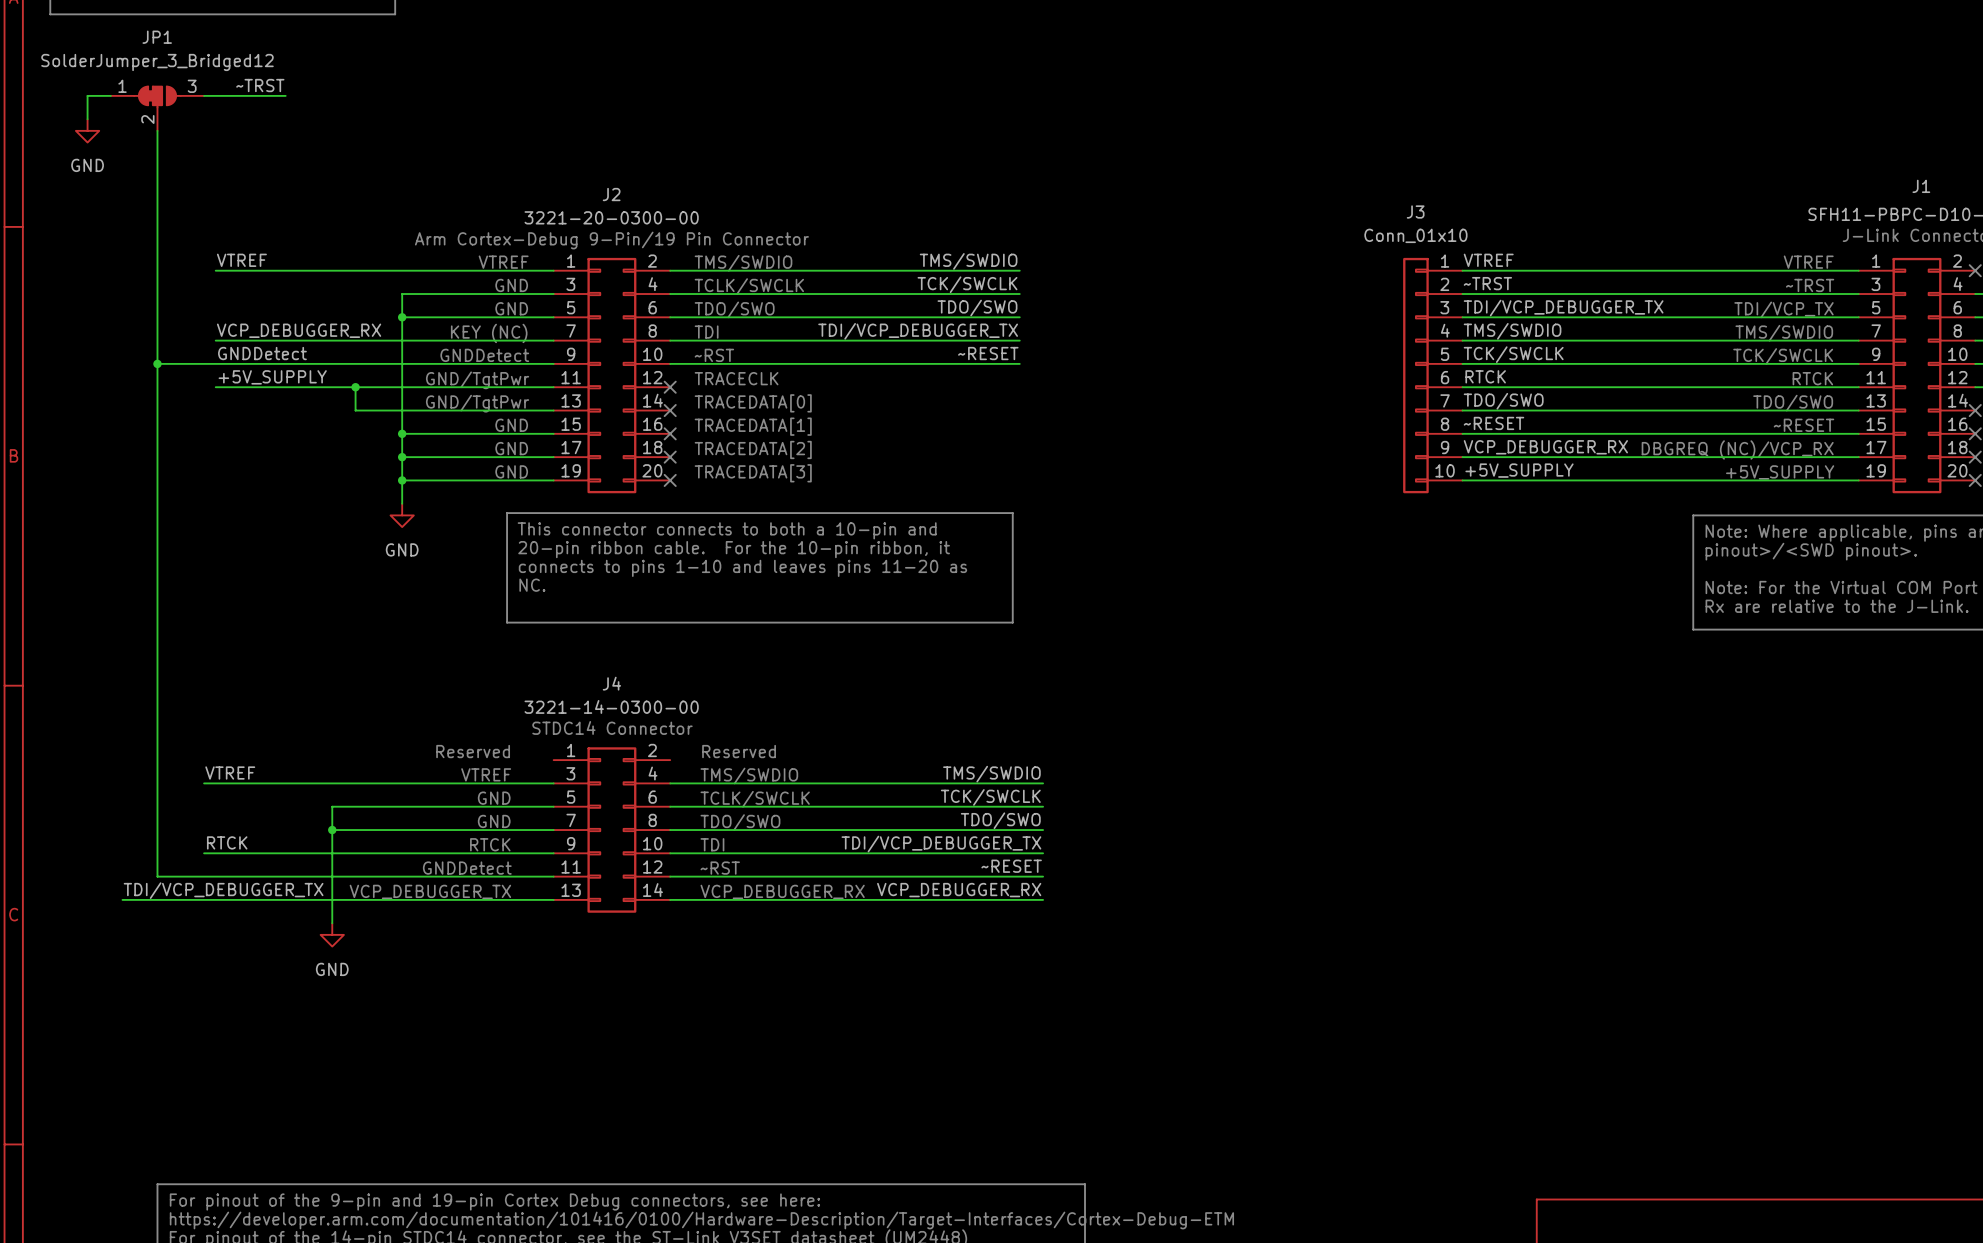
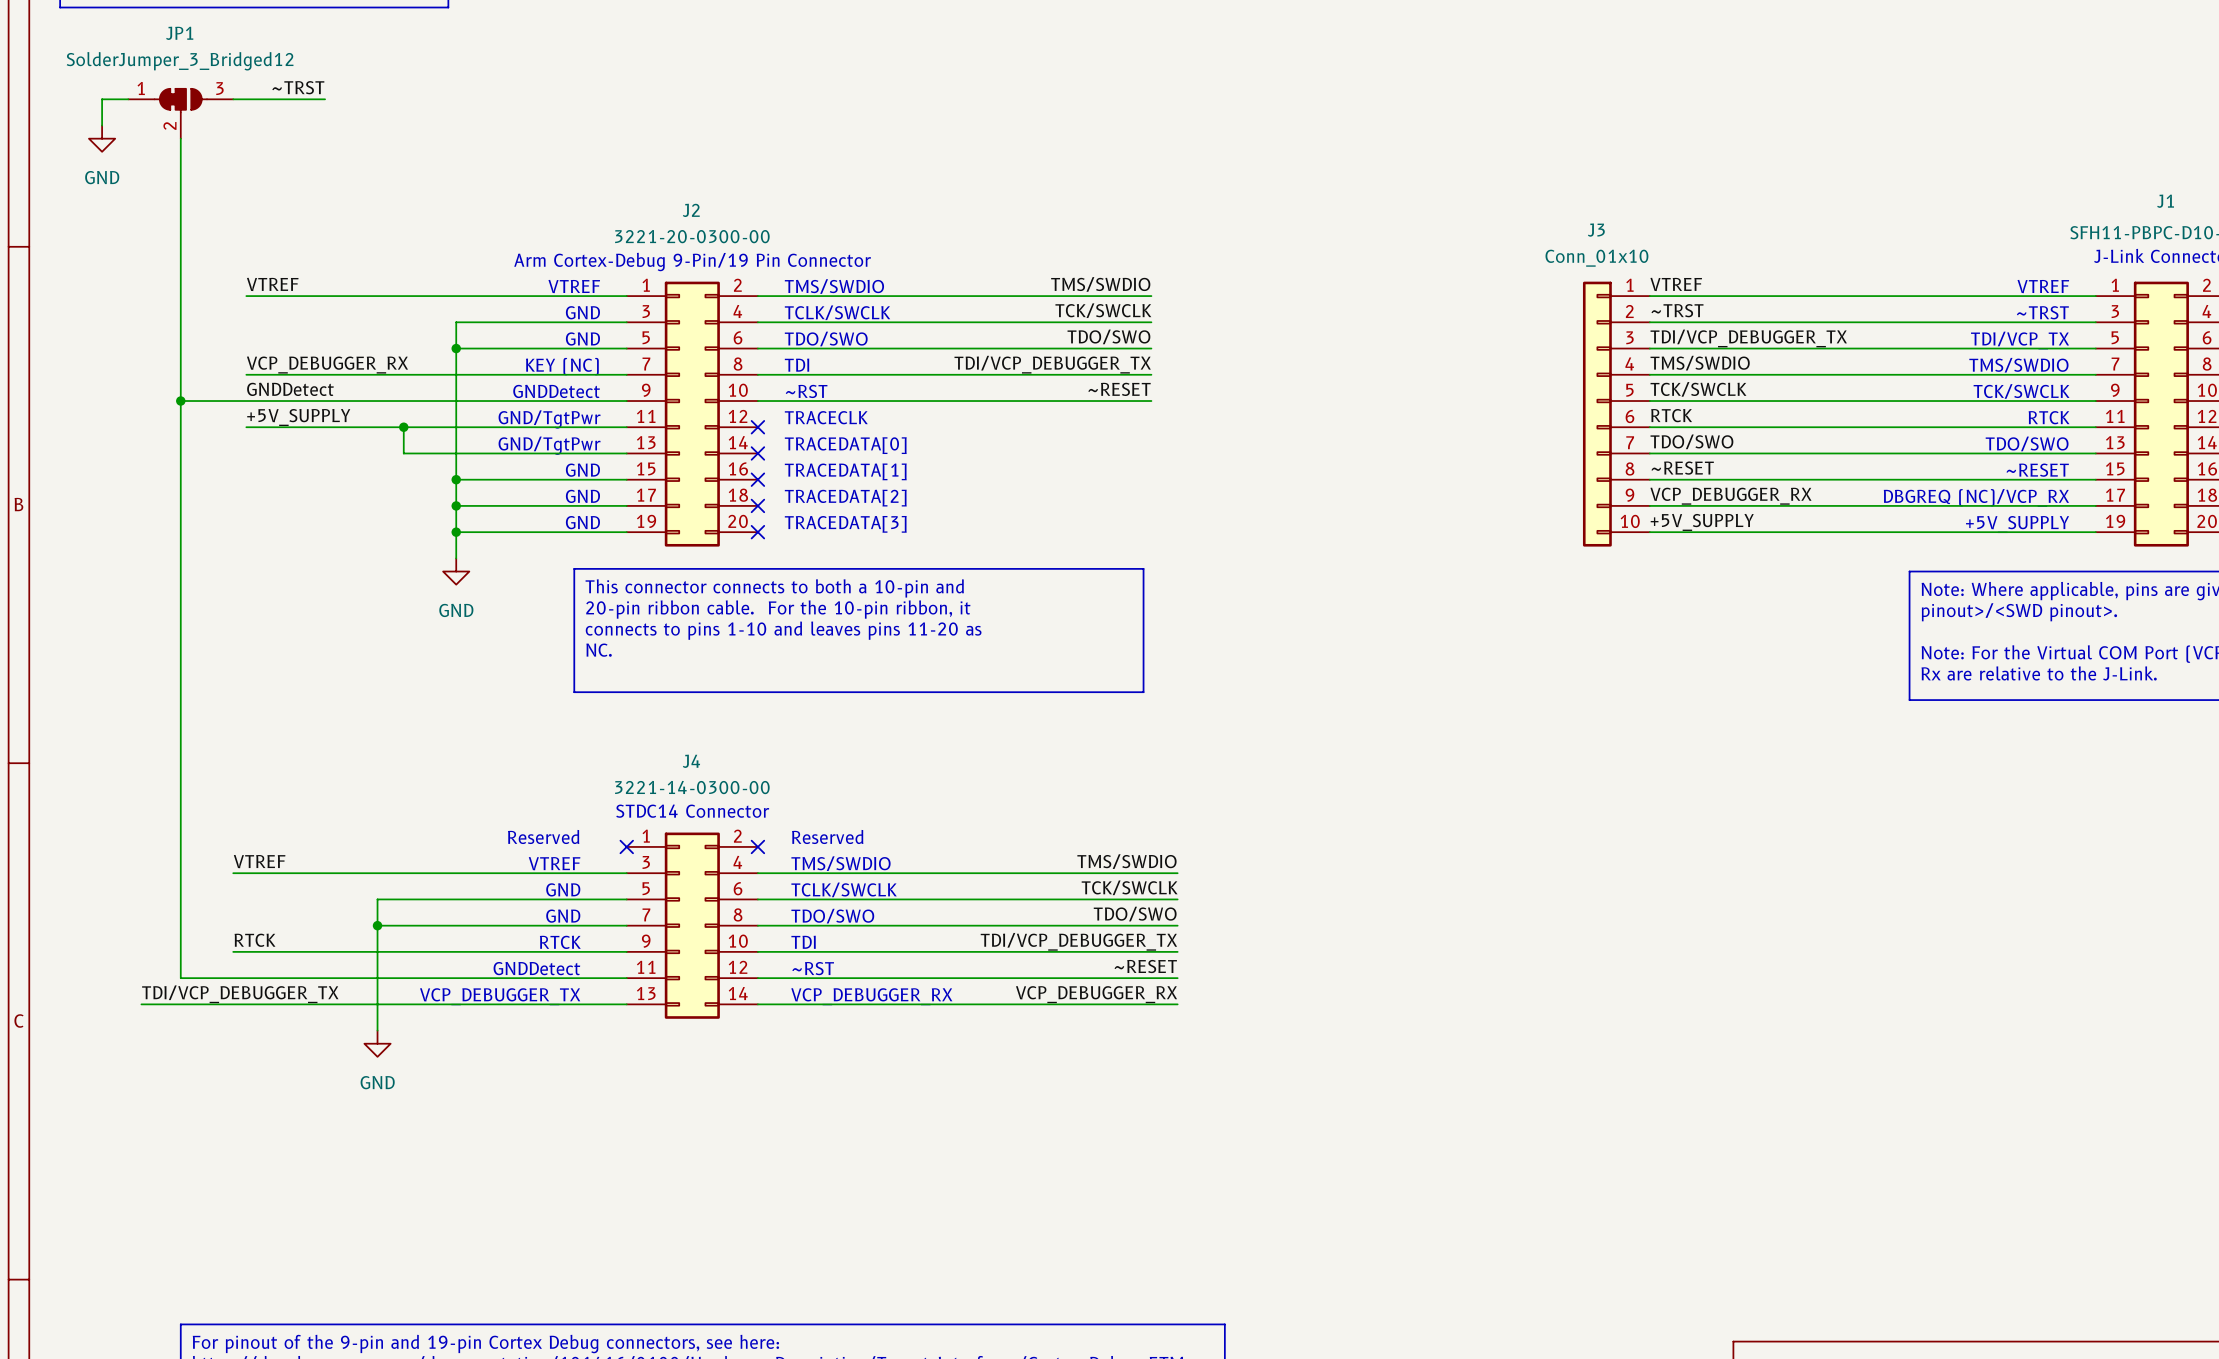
no-connect mark: none -> (626, 846)
no-connect mark: none -> (757, 846)

